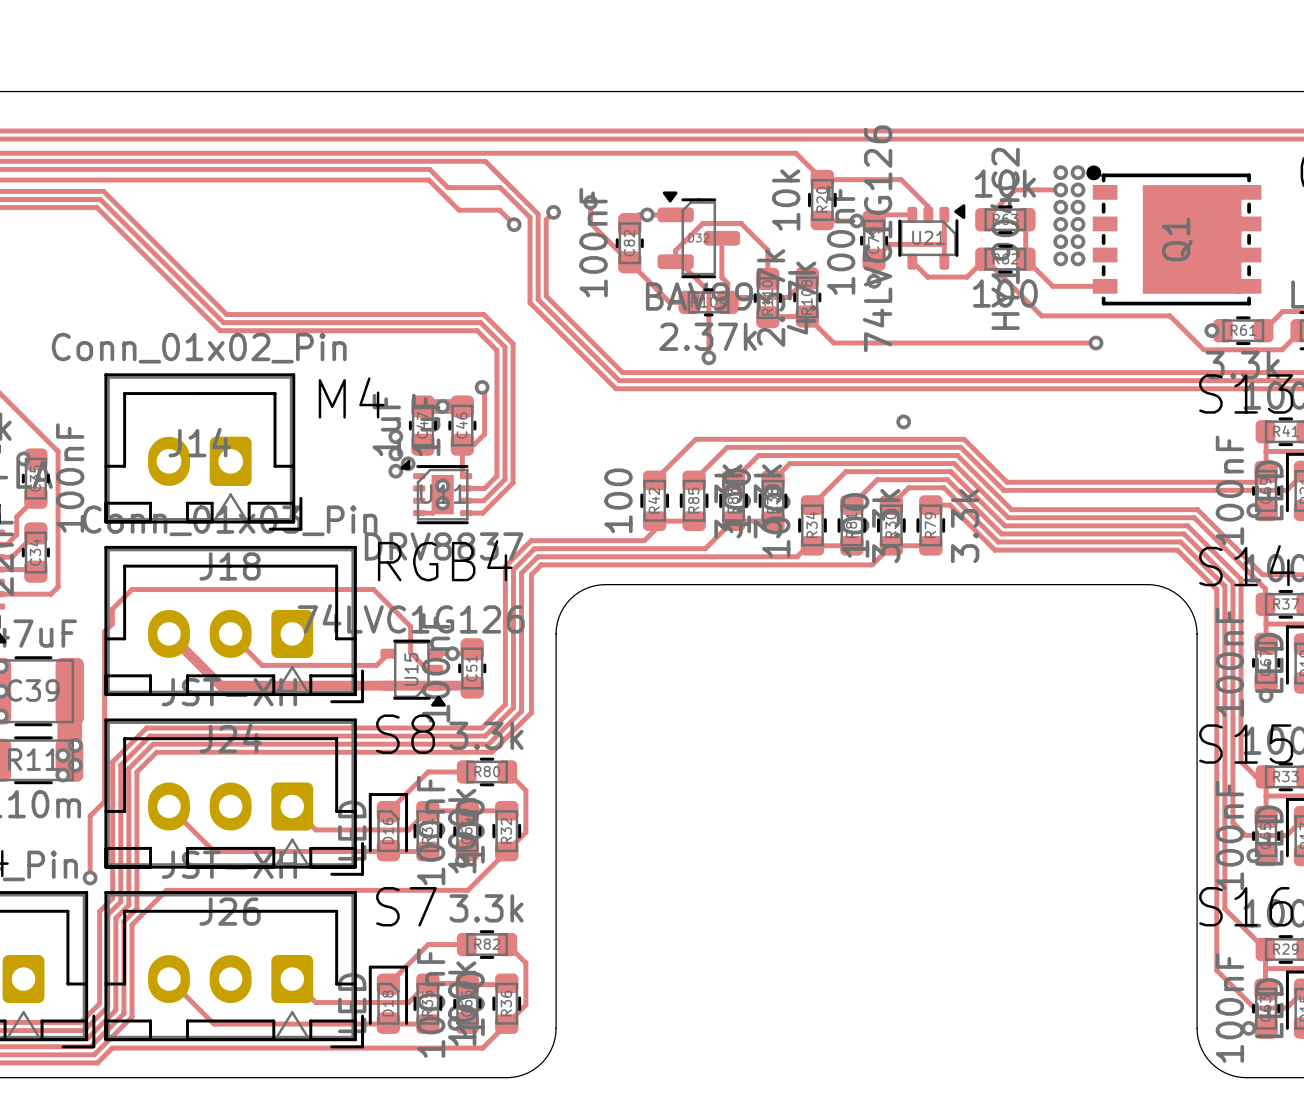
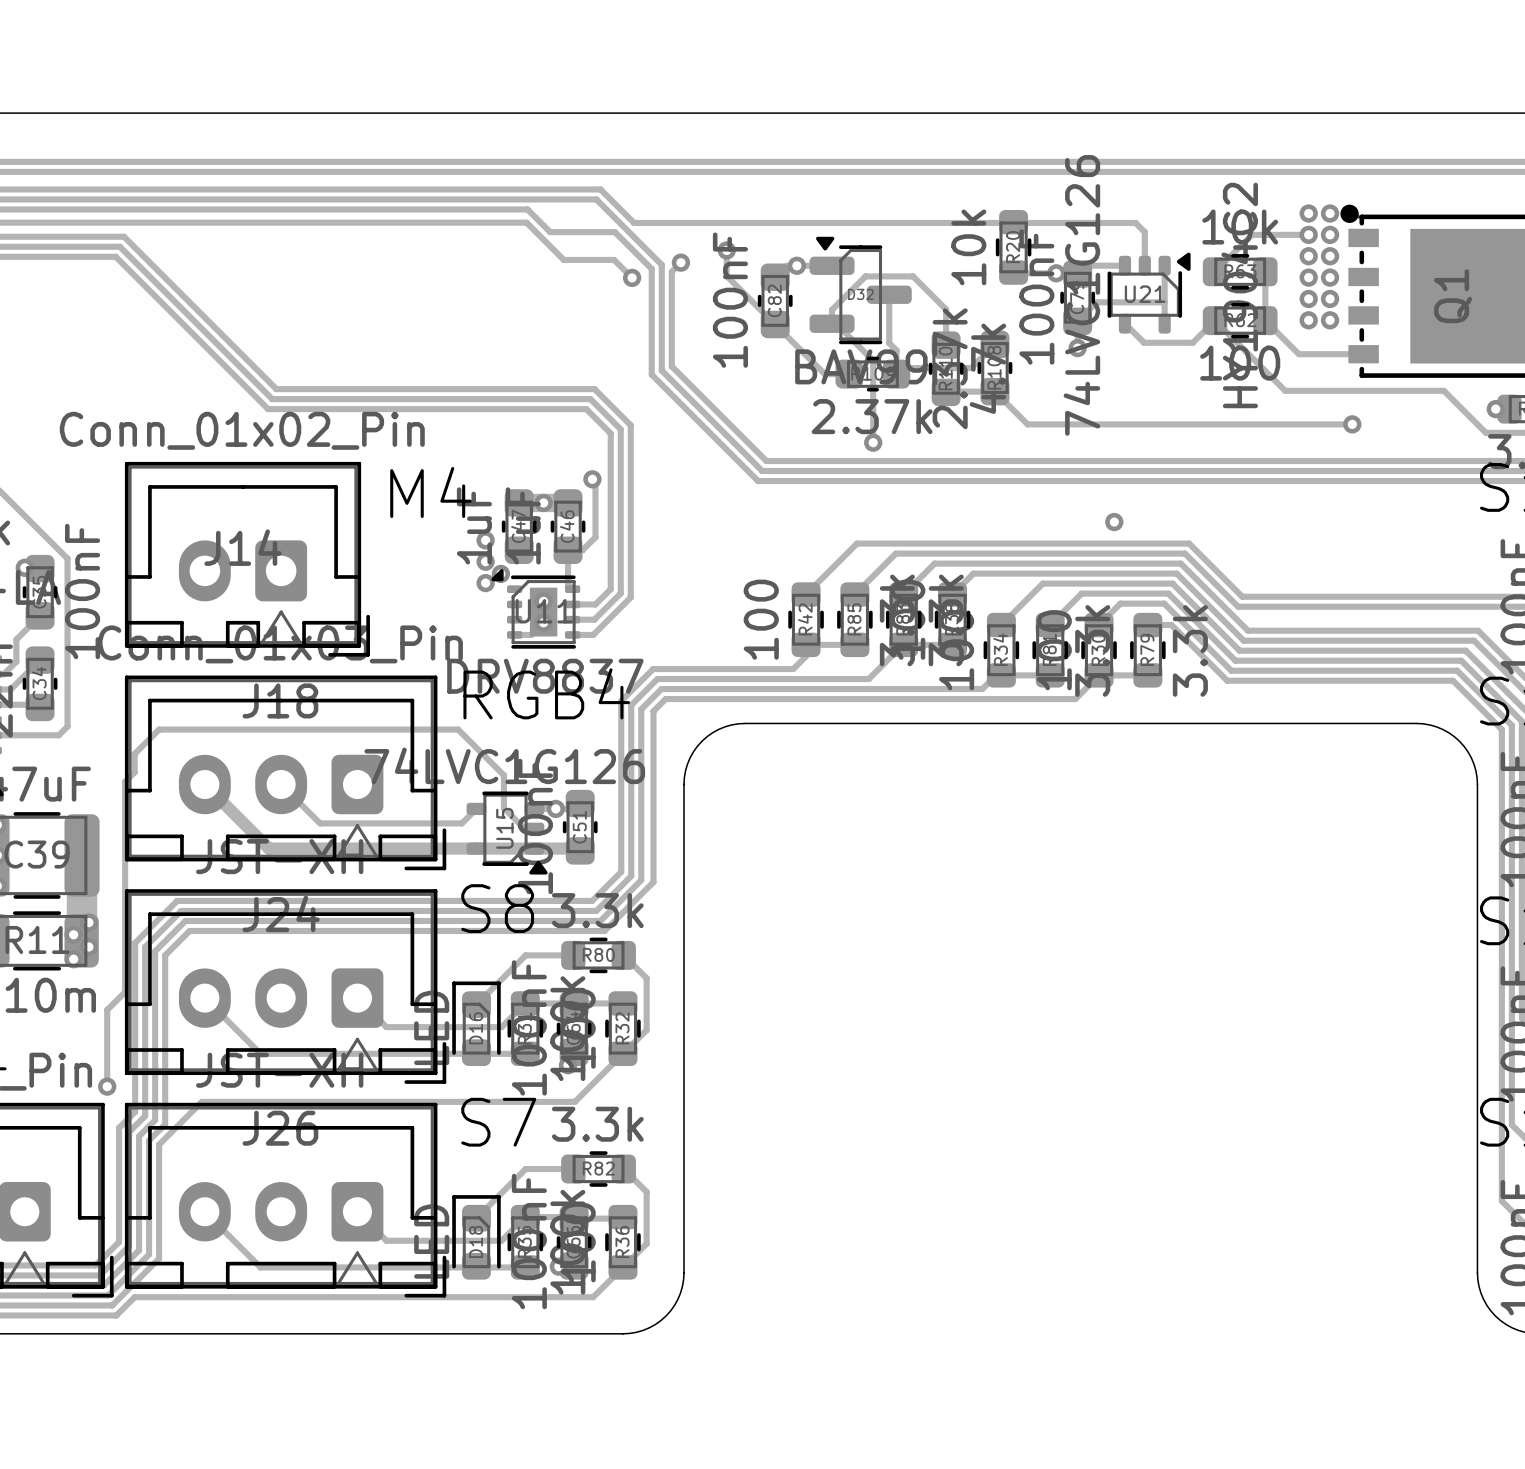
track: (488, 153) (795, 153) (822, 179) (901, 179) (928, 206) -> (600, 189) (634, 222) (1135, 222) (1144, 232) (1144, 255)

